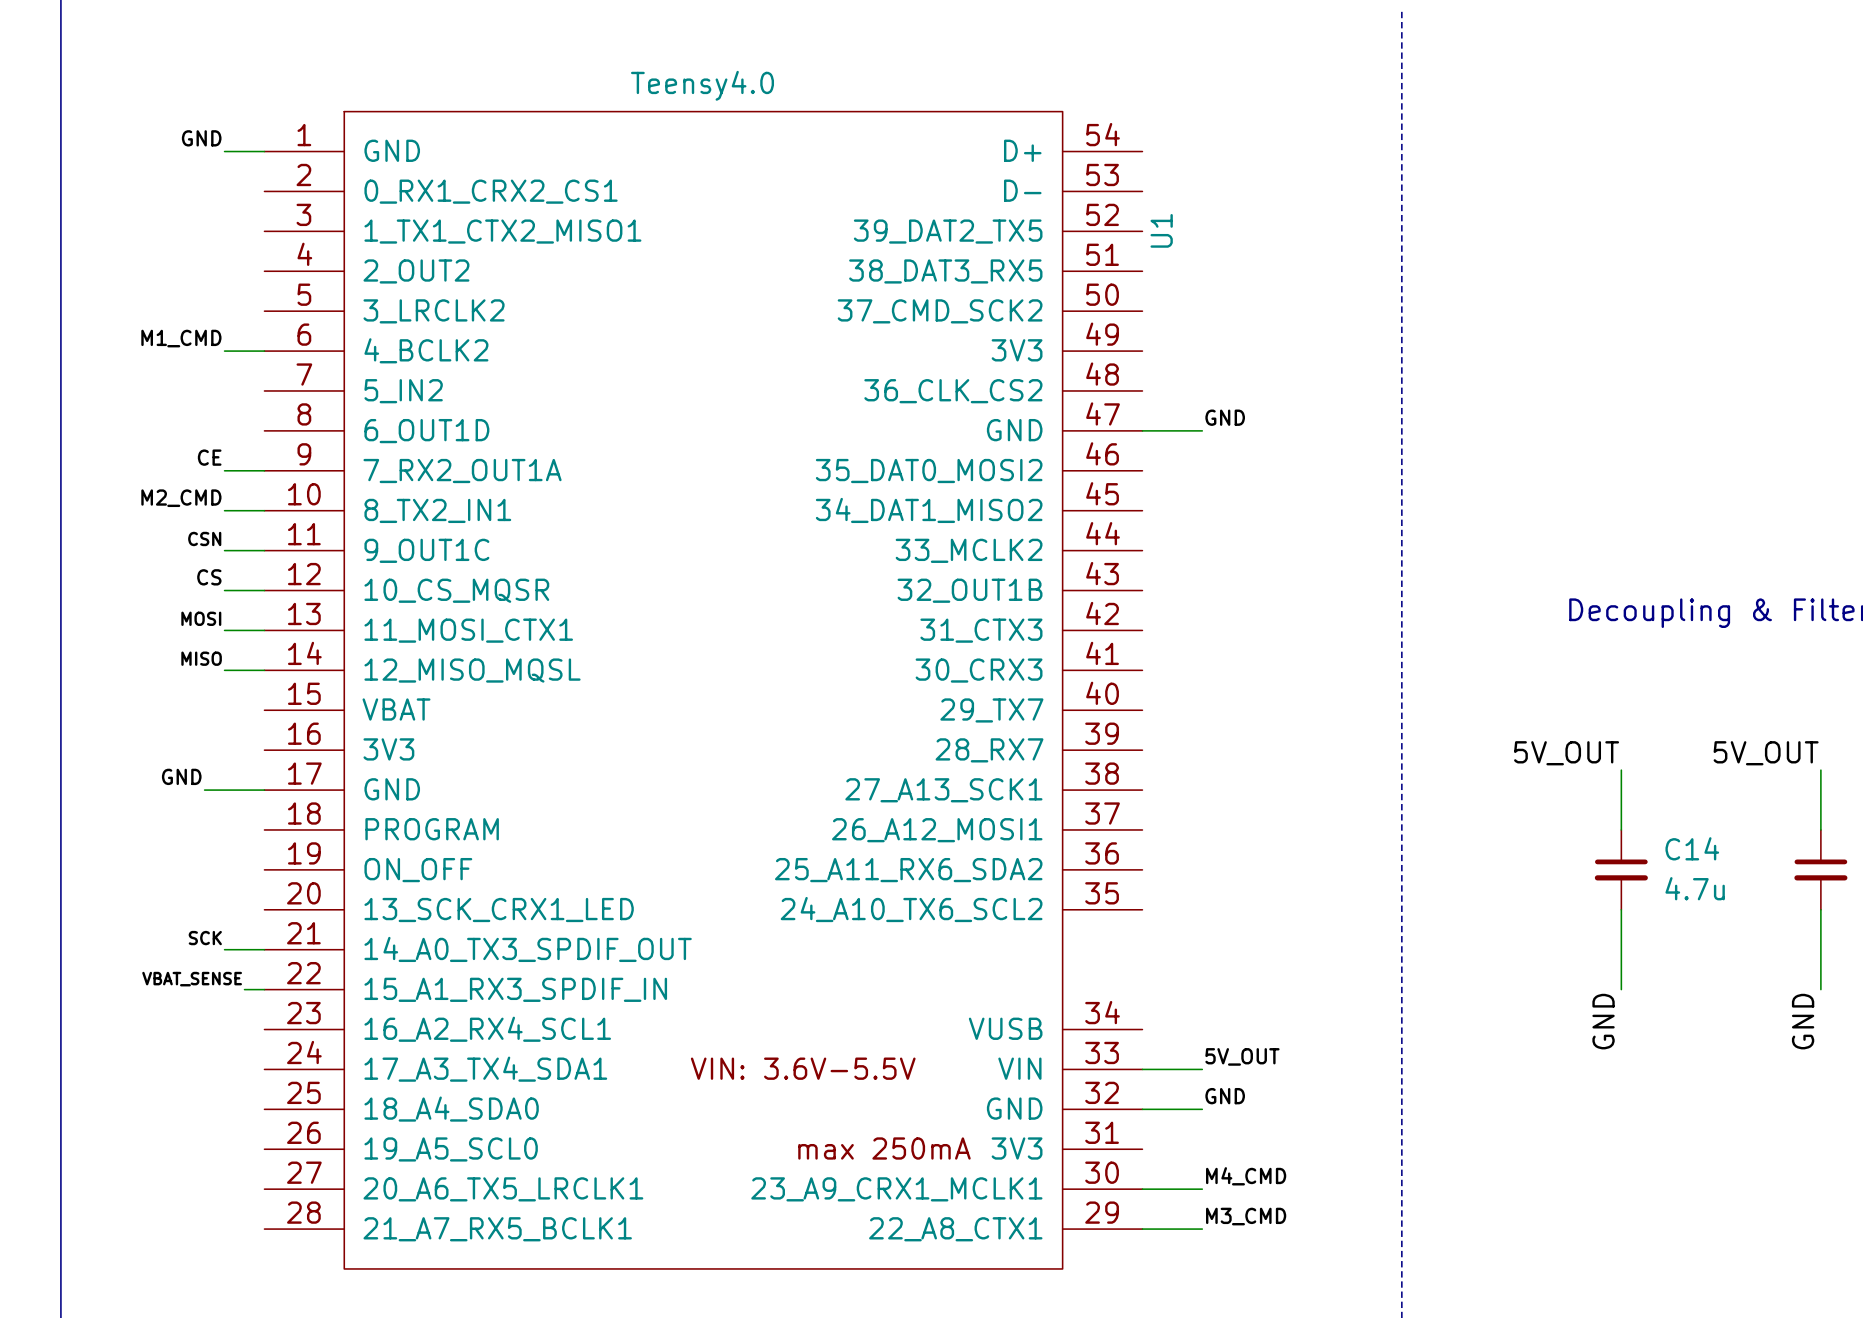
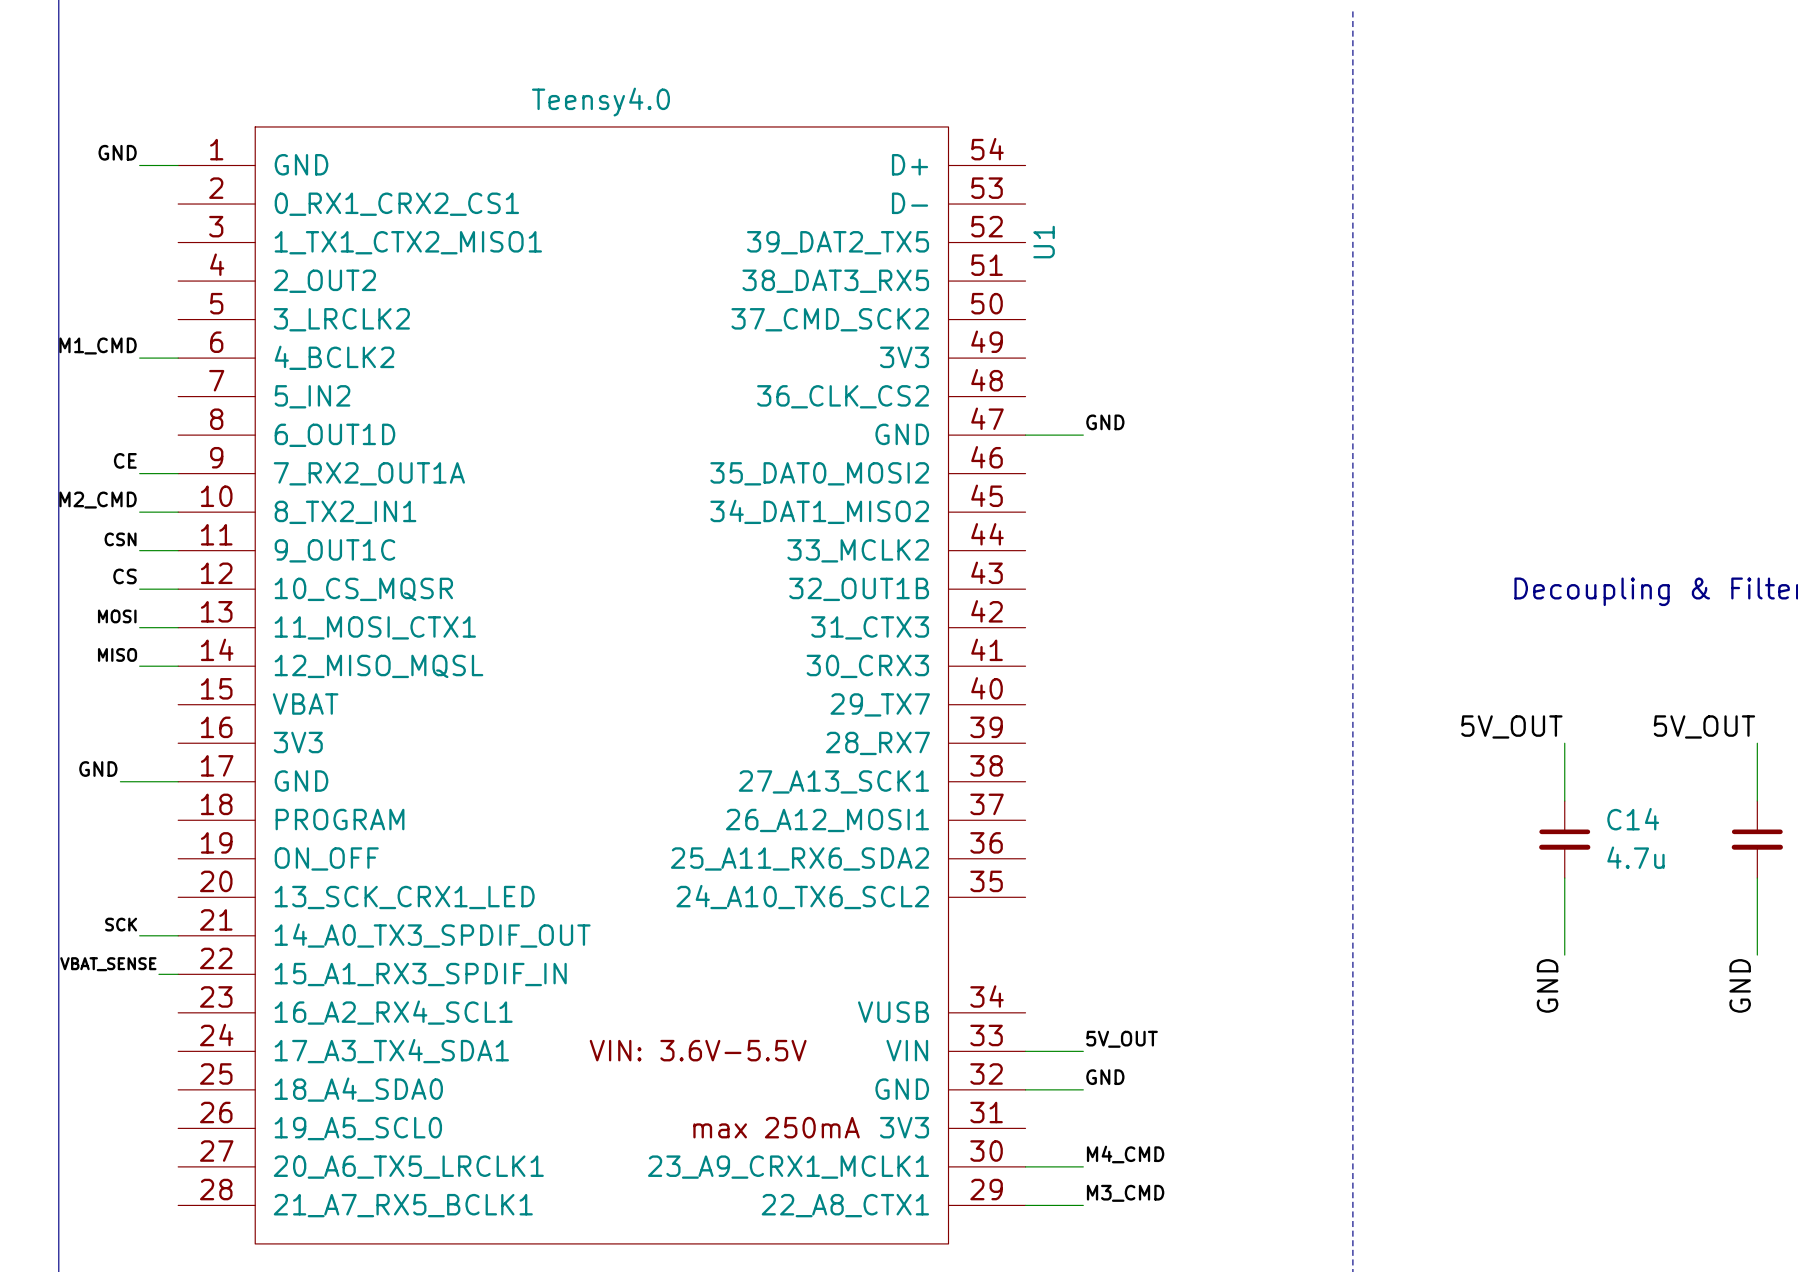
label position: GND (201, 138) -> GND (117, 152)
wire: (224, 151) (264, 151) -> (139, 165) (178, 165)
label position: M1_CMD (181, 338) -> M1_CMD (98, 345)
wire: (224, 351) (264, 351) -> (139, 358) (178, 358)
label position: GND (1225, 417) -> GND (1105, 422)
wire: (1142, 430) (1202, 430) -> (1025, 435) (1083, 435)
label position: CE (209, 457) -> CE (125, 460)
wire: (224, 470) (264, 470) -> (139, 473) (178, 473)
label position: M2_CMD (181, 498) -> M2_CMD (98, 500)
wire: (224, 510) (264, 510) -> (139, 512) (178, 512)
label position: CSN (204, 538) -> CSN (120, 539)
wire: (224, 550) (264, 550) -> (139, 550) (178, 550)
label position: CS (209, 577) -> CS (125, 576)
wire: (224, 590) (264, 590) -> (139, 589) (178, 589)
label position: MOSI (201, 618) -> MOSI (117, 616)
wire: (224, 630) (264, 630) -> (139, 627) (178, 627)
label position: MISO (201, 658) -> MISO (117, 654)
wire: (224, 670) (264, 670) -> (139, 666) (178, 666)
U1 position: (703, 690) -> (601, 685)
label position: GND (181, 776) -> GND (98, 769)
wire: (204, 790) (264, 790) -> (120, 781) (178, 781)
label position: SCK (205, 938) -> SCK (121, 924)
wire: (224, 949) (264, 949) -> (139, 935) (178, 935)
label position: VBAT_SENSE (192, 979) -> VBAT_SENSE (108, 964)
wire: (244, 989) (264, 989) -> (158, 974) (178, 974)
label position: 5V_OUT (1242, 1056) -> 5V_OUT (1122, 1039)
wire: (1142, 1069) (1202, 1069) -> (1025, 1051) (1083, 1051)
label position: GND (1225, 1096) -> GND (1105, 1077)
wire: (1142, 1109) (1202, 1109) -> (1025, 1089) (1083, 1089)
label position: M4_CMD (1246, 1176) -> M4_CMD (1125, 1154)
wire: (1142, 1189) (1202, 1189) -> (1025, 1166) (1083, 1166)
label position: M3_CMD (1246, 1216) -> M3_CMD (1125, 1193)
wire: (1142, 1229) (1202, 1229) -> (1025, 1205) (1083, 1205)

